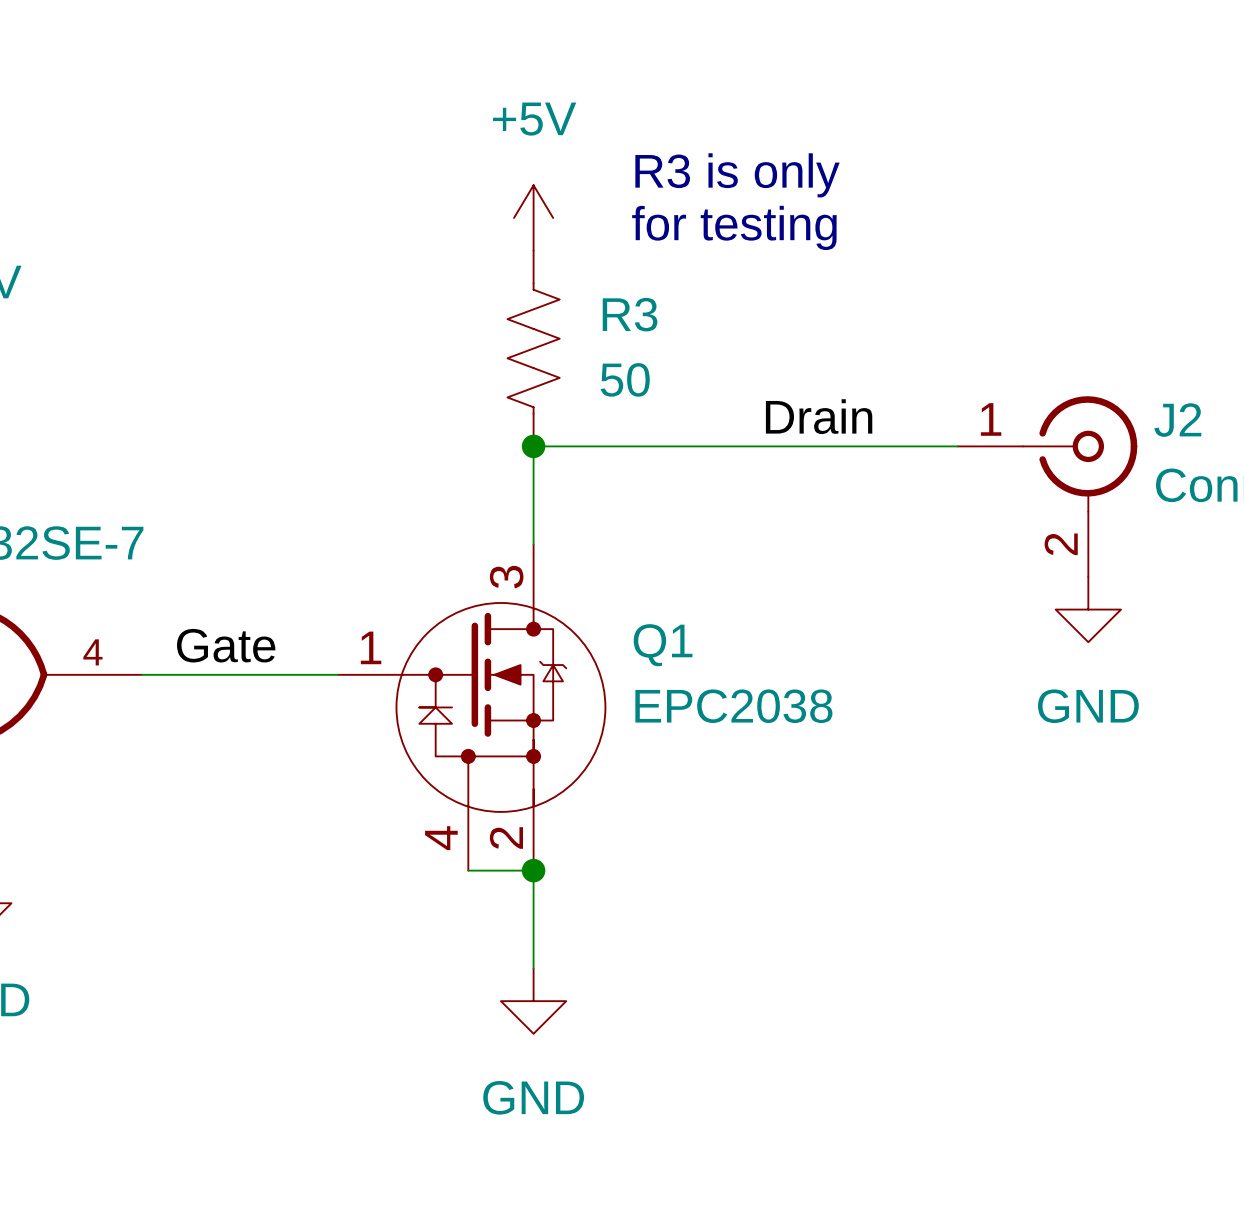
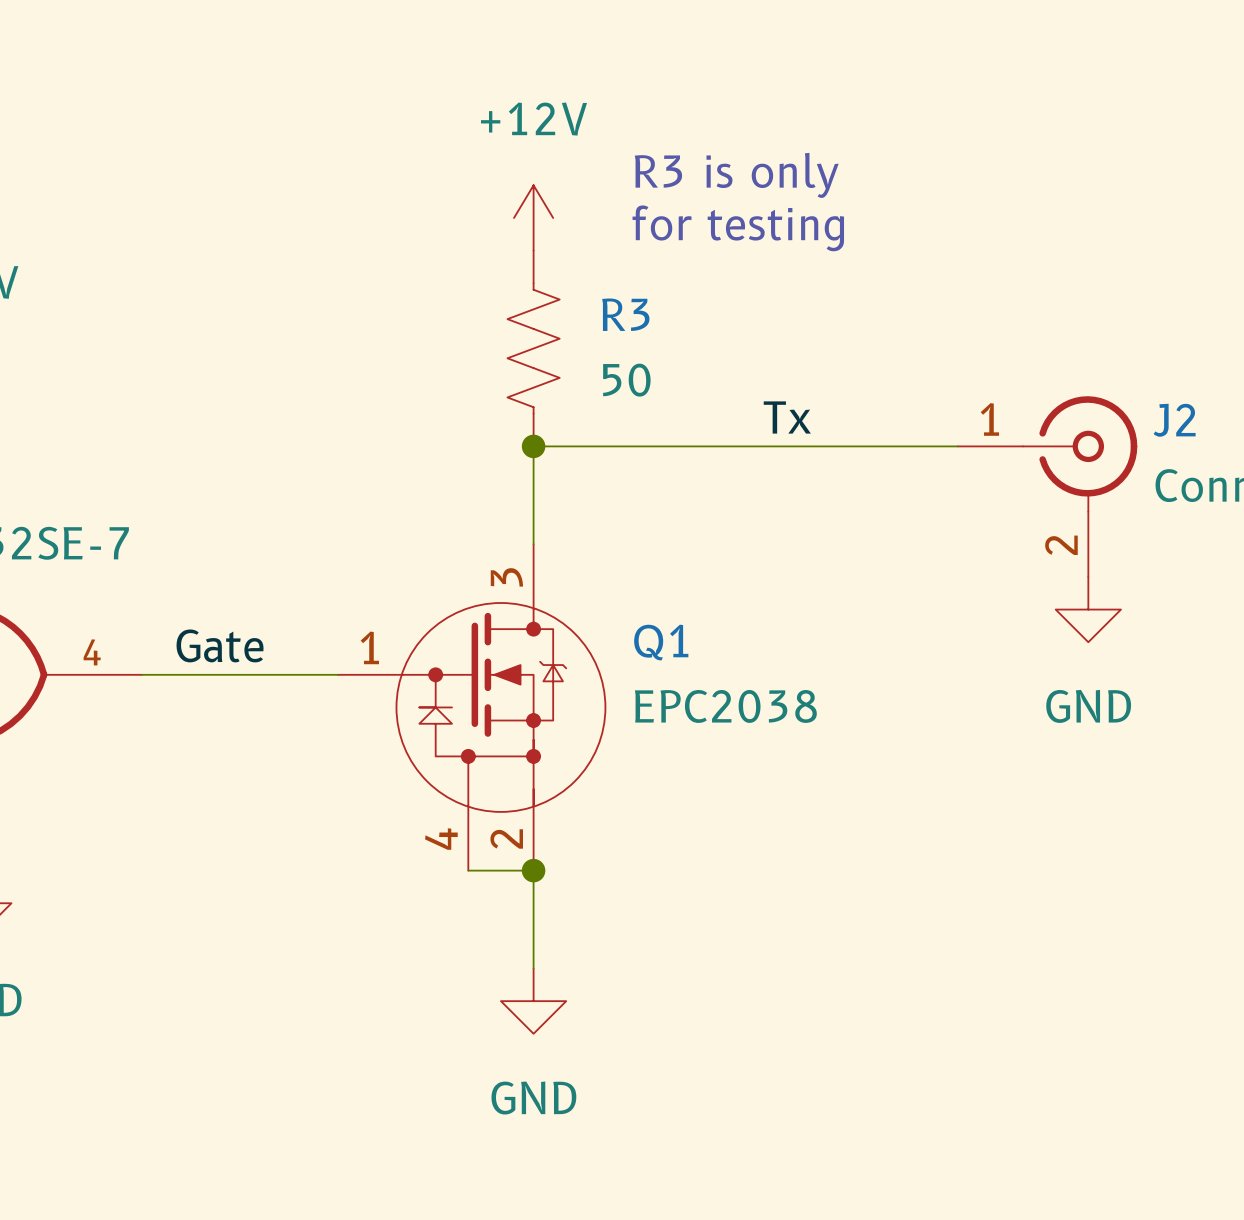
power symbol: +5V (533, 217) -> +12V (533, 217)
label: Drain (819, 416) -> Tx (787, 417)

